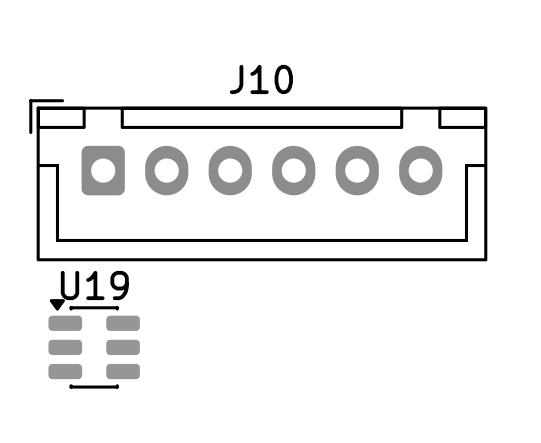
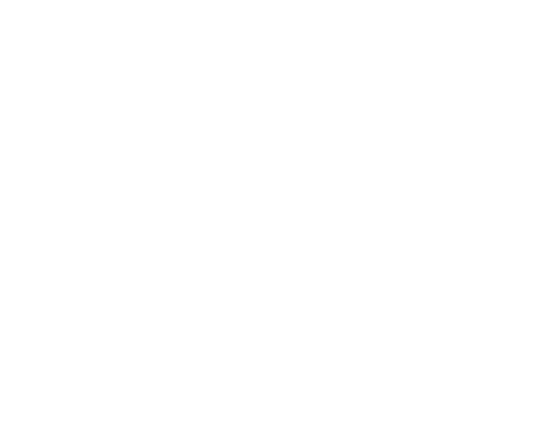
J10: (258, 180) -> none
U19: (94, 343) -> none

